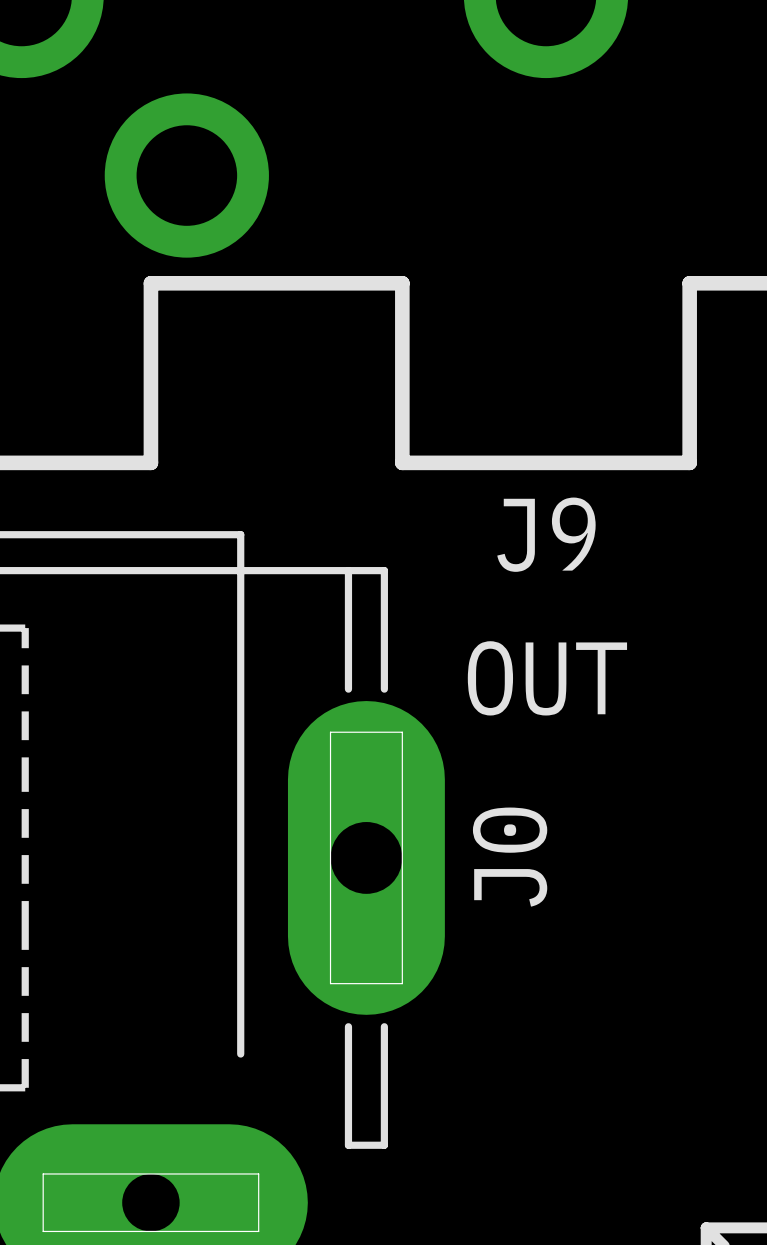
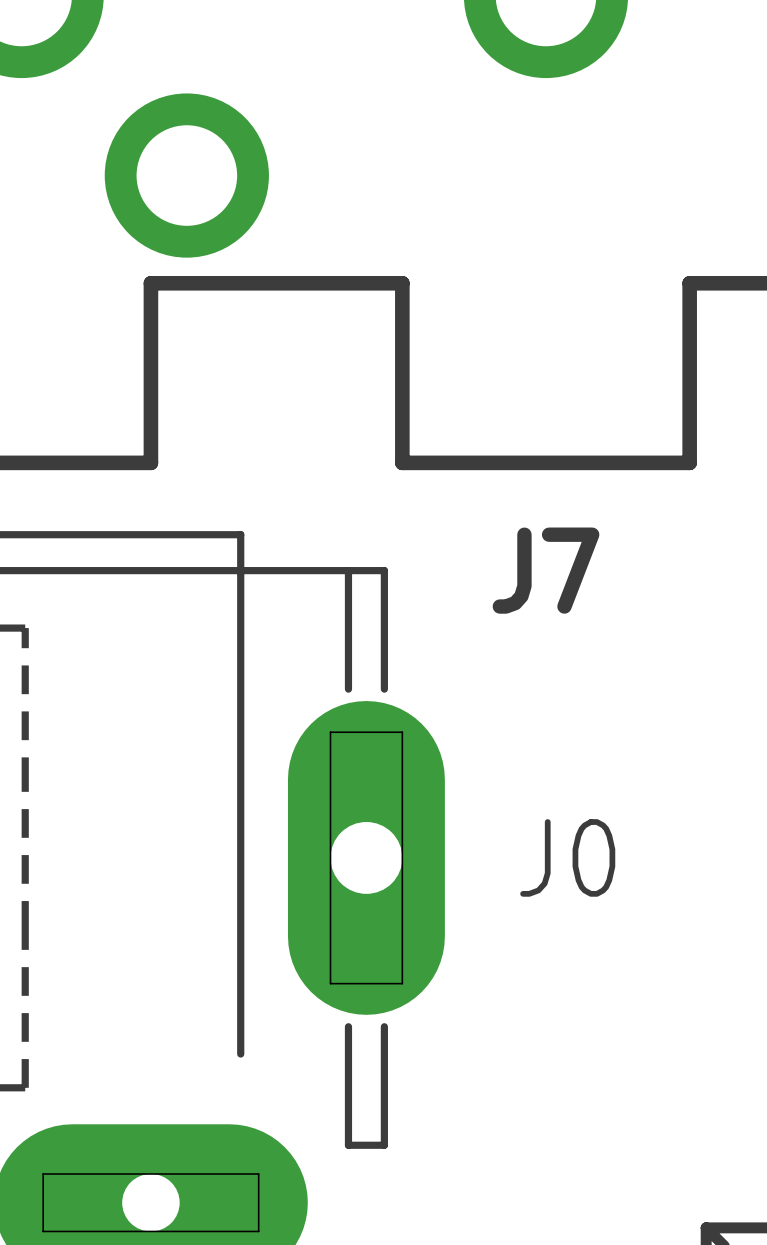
J9 name: J9 (546, 534) -> J7 (546, 570)
text: OUT (547, 678) -> none
J0 name rotation: 0° (510, 857) -> 90° clockwise (567, 857)

